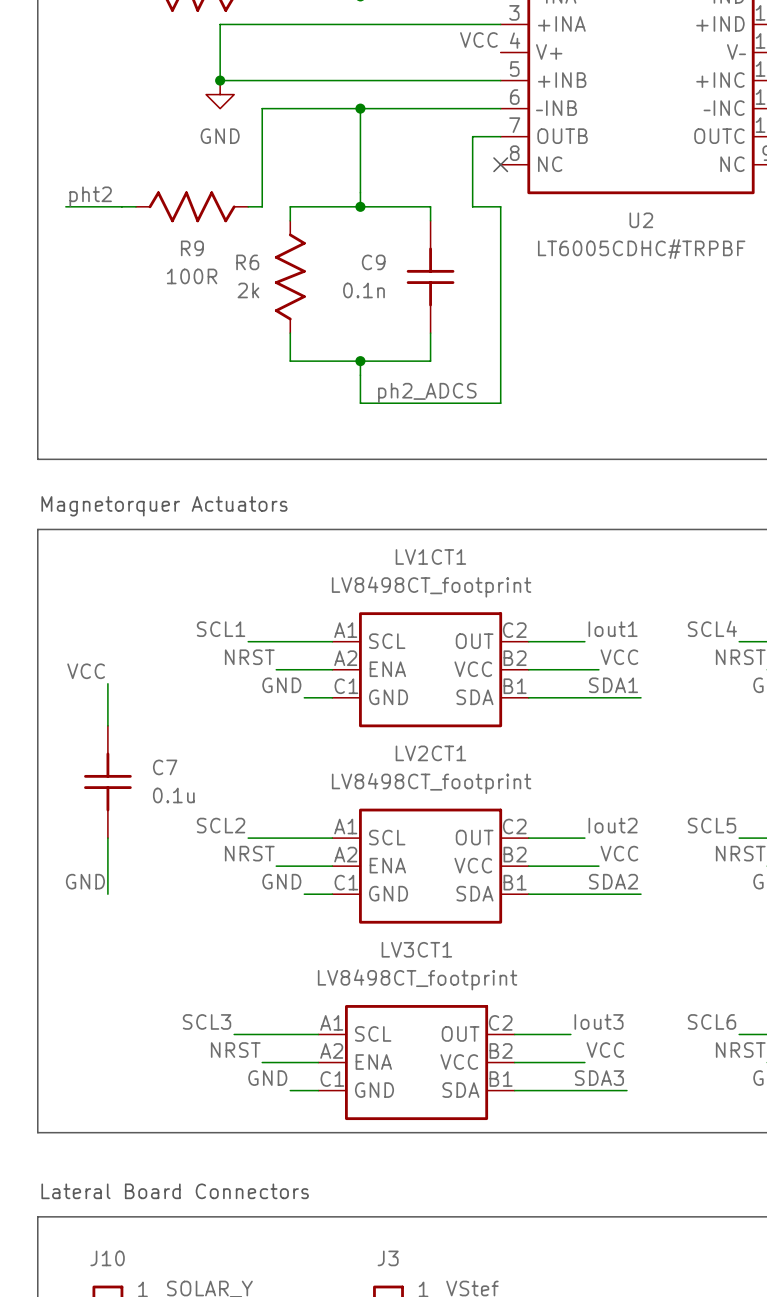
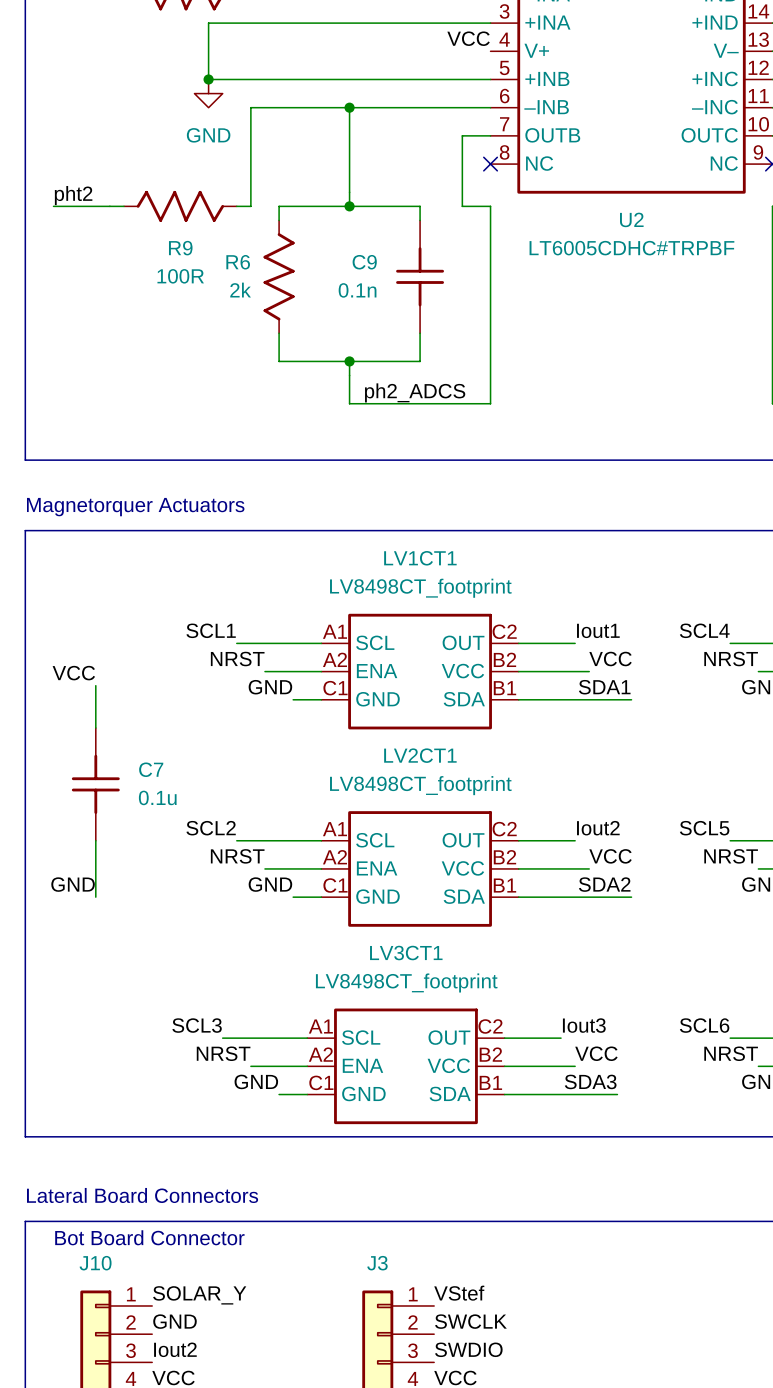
text: none -> Bot Board Connector (149, 1237)

